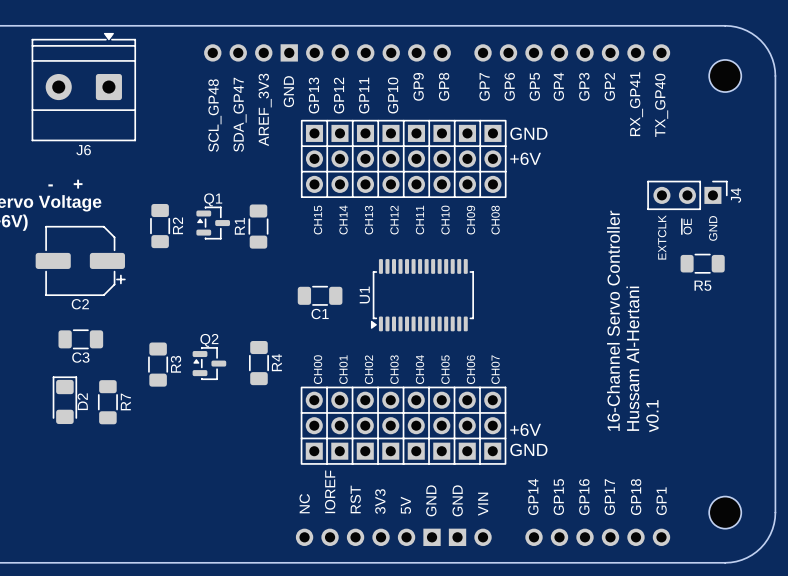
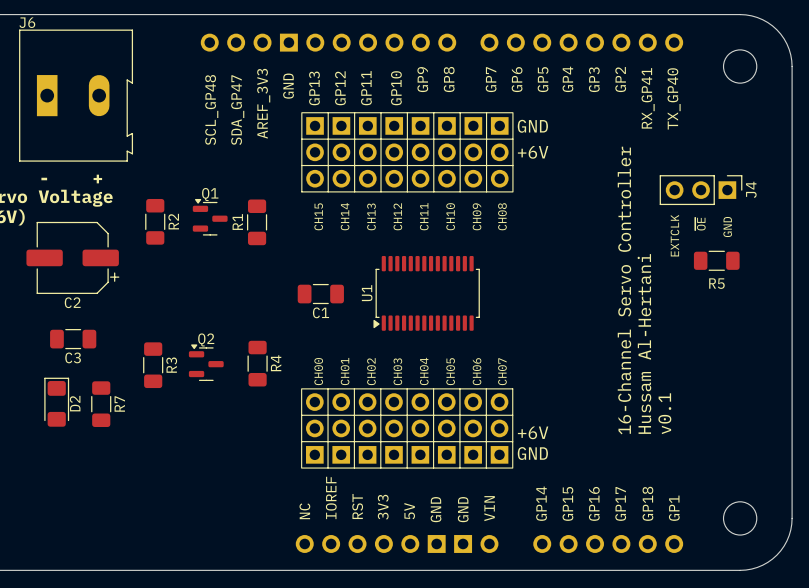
J6 footprint: [31, 32, 136, 142] -> [19, 29, 134, 162]
J6 name position: J6 (83, 150) -> J6 (27, 22)
Q1 footprint: [196, 206, 231, 240] -> [192, 198, 228, 236]
Q2 footprint: [192, 347, 227, 380] -> [188, 344, 224, 381]

